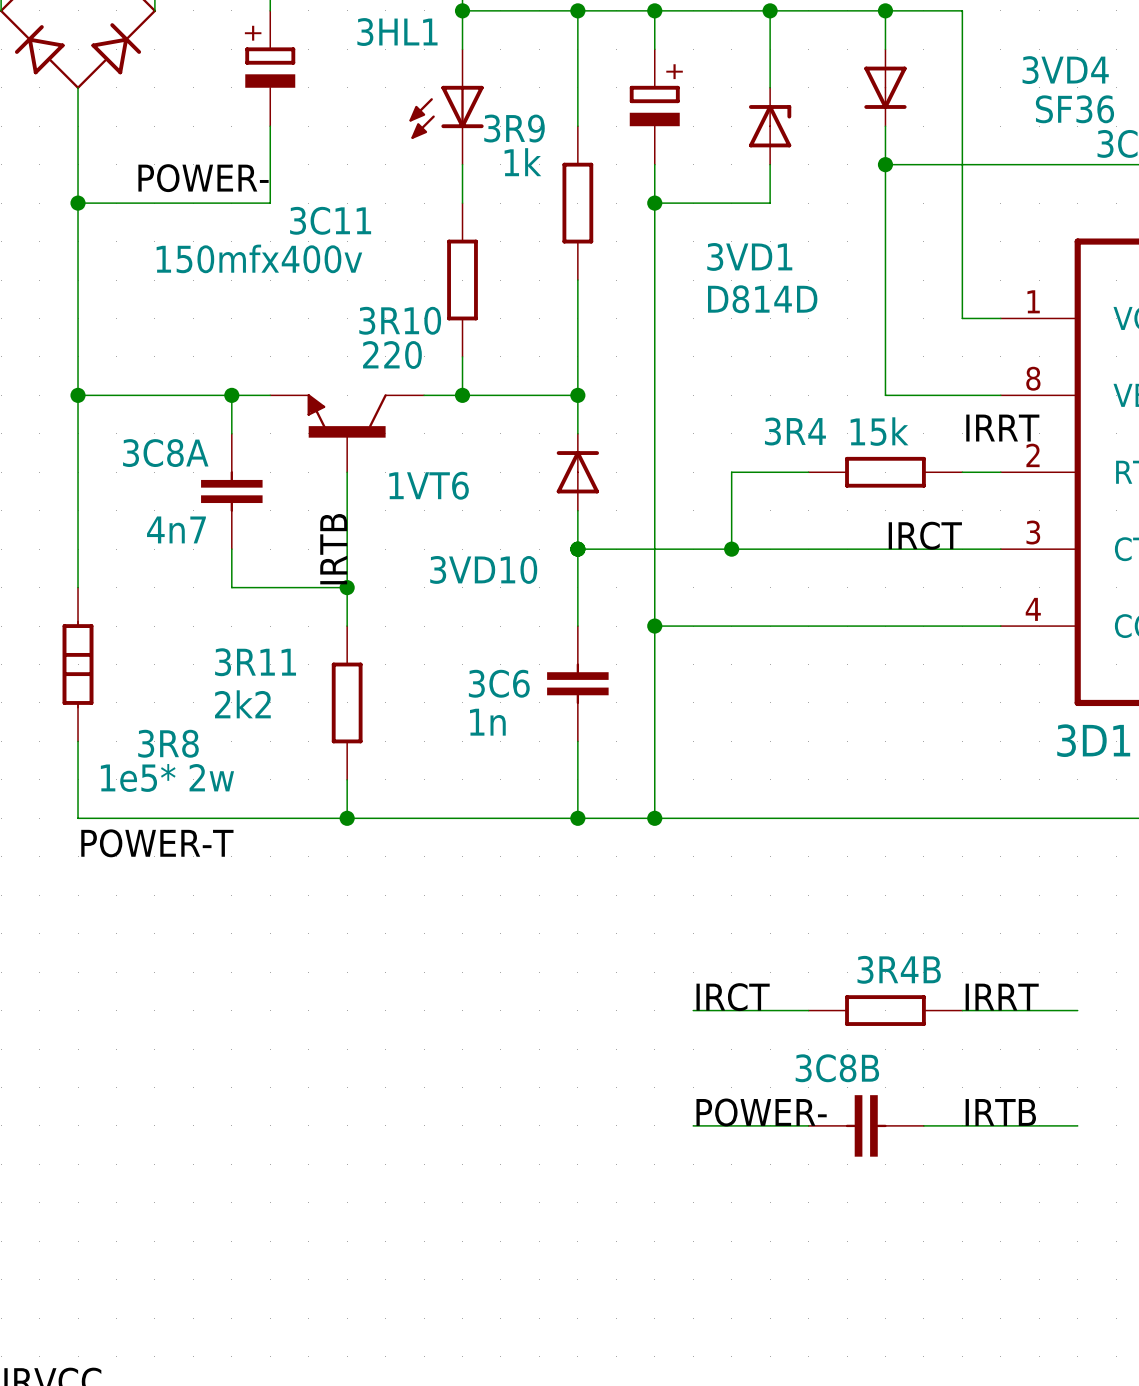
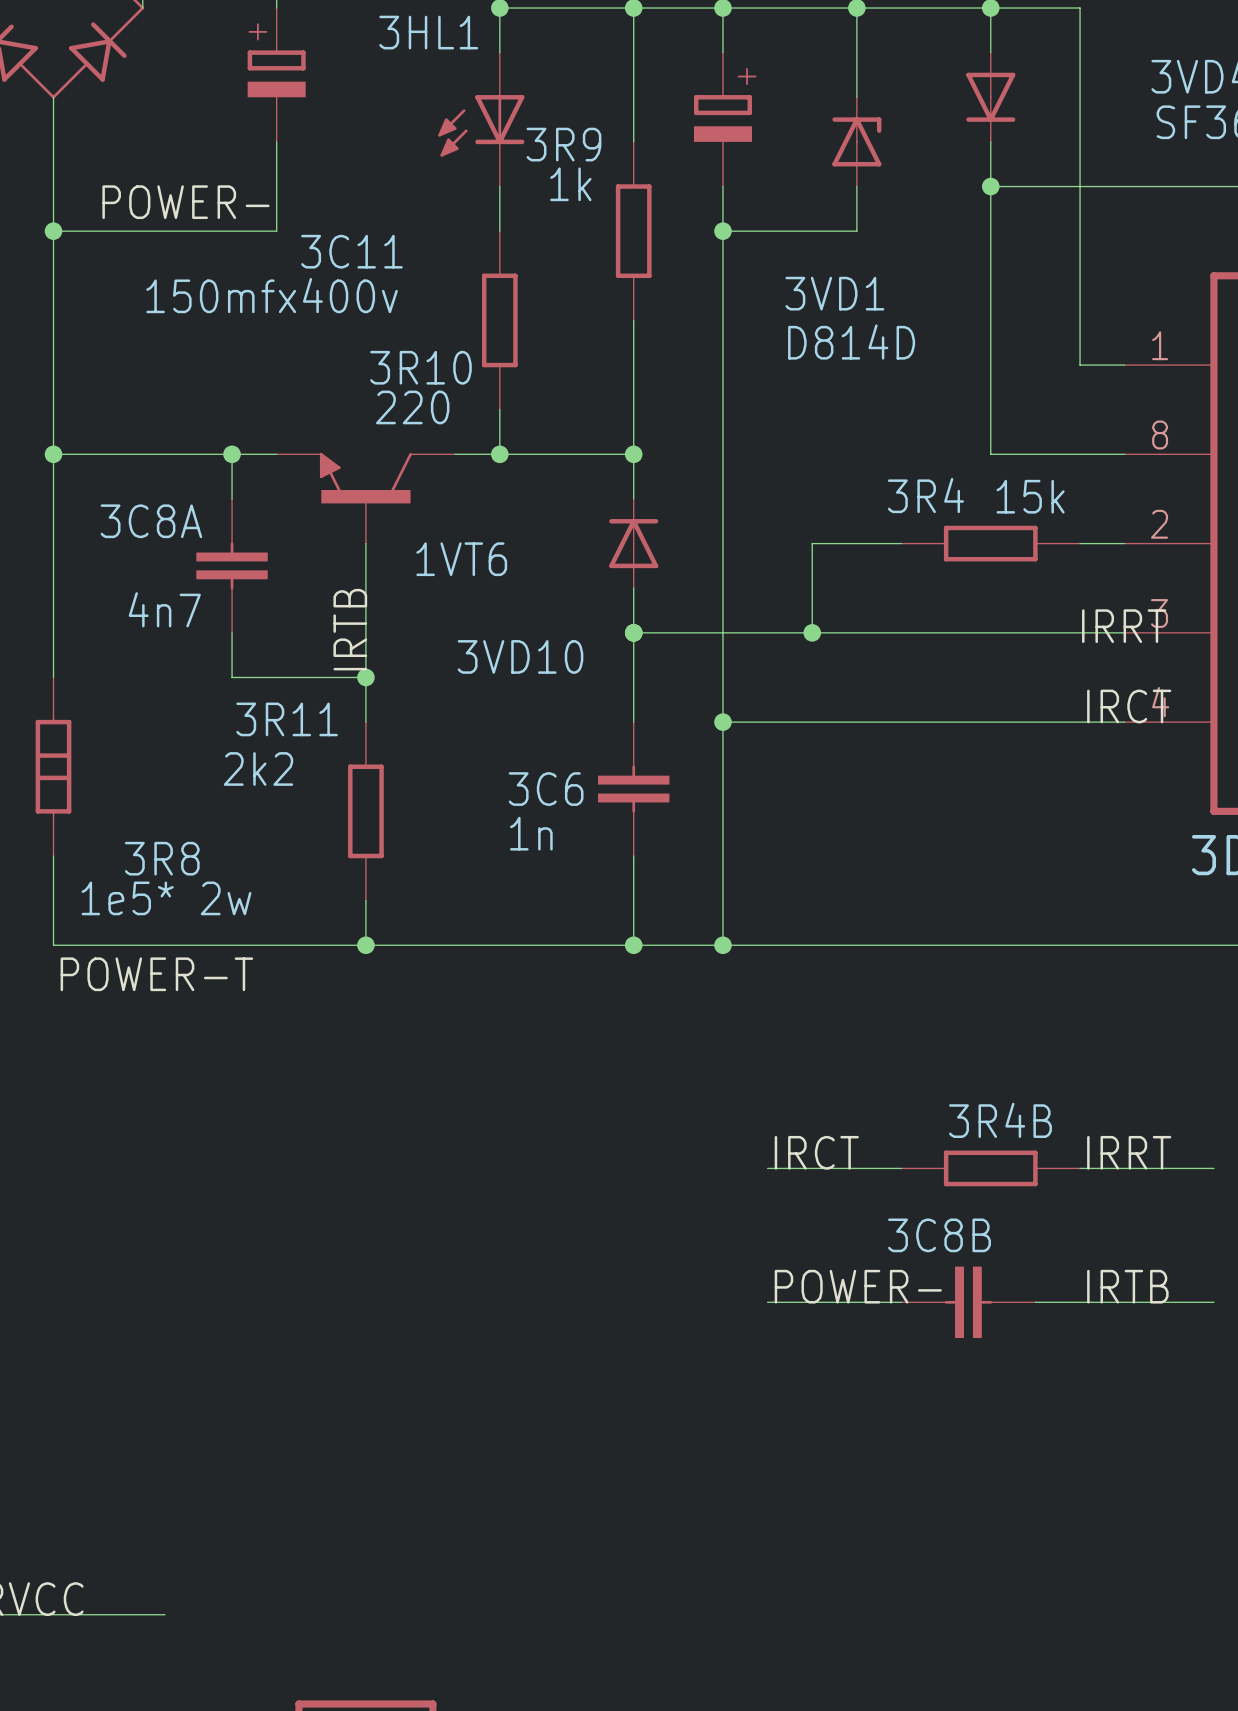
label position: IRRT (1002, 428) -> IRRT (1124, 626)
3R4 name position: 3R4 (795, 431) -> 3R4 (925, 495)
3R4 value position: 15k (879, 431) -> 15k (1030, 496)
label position: IRCT (925, 535) -> IRCT (1129, 706)
3R11 name position: 3R11 (255, 662) -> 3R11 (287, 719)
3R11 value position: 2k2 (242, 704) -> 2k2 (258, 768)

